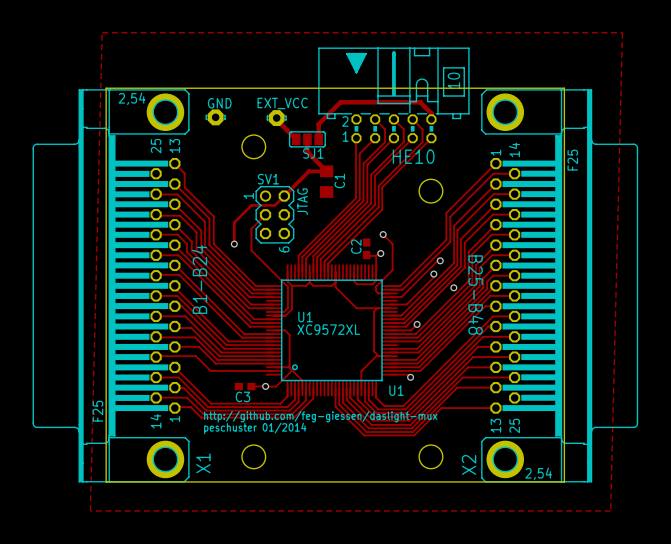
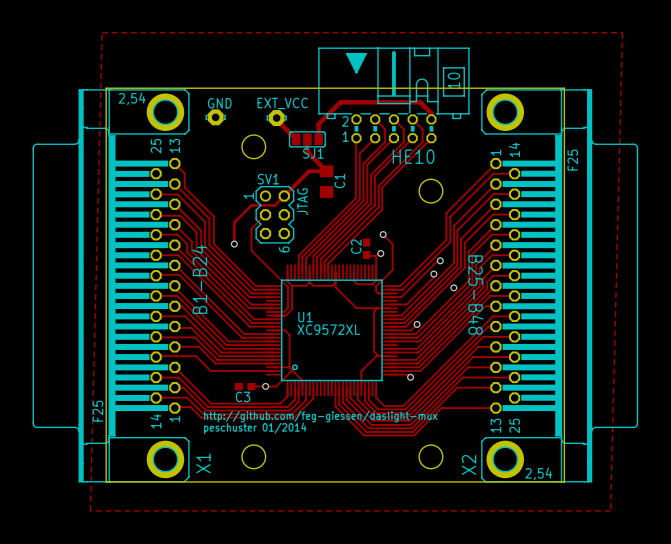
text: U1 (396, 390) -> none

